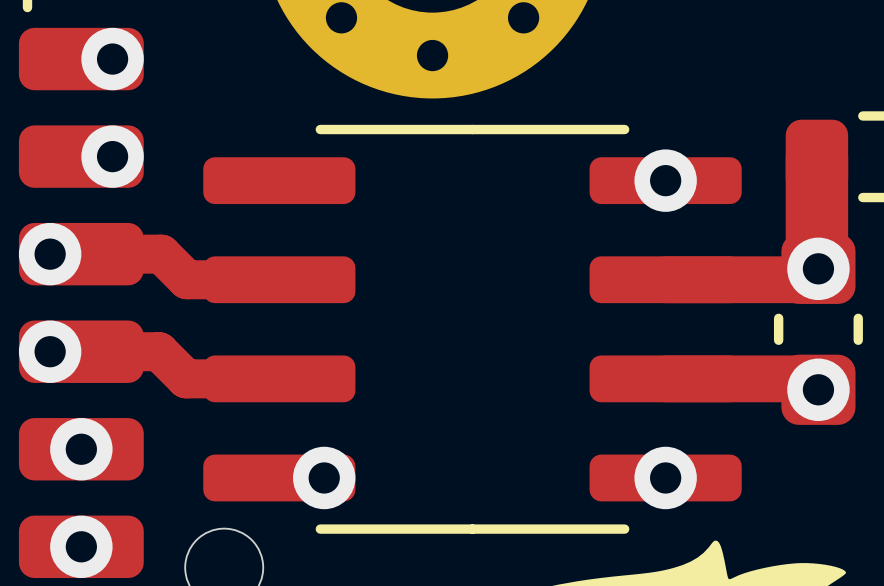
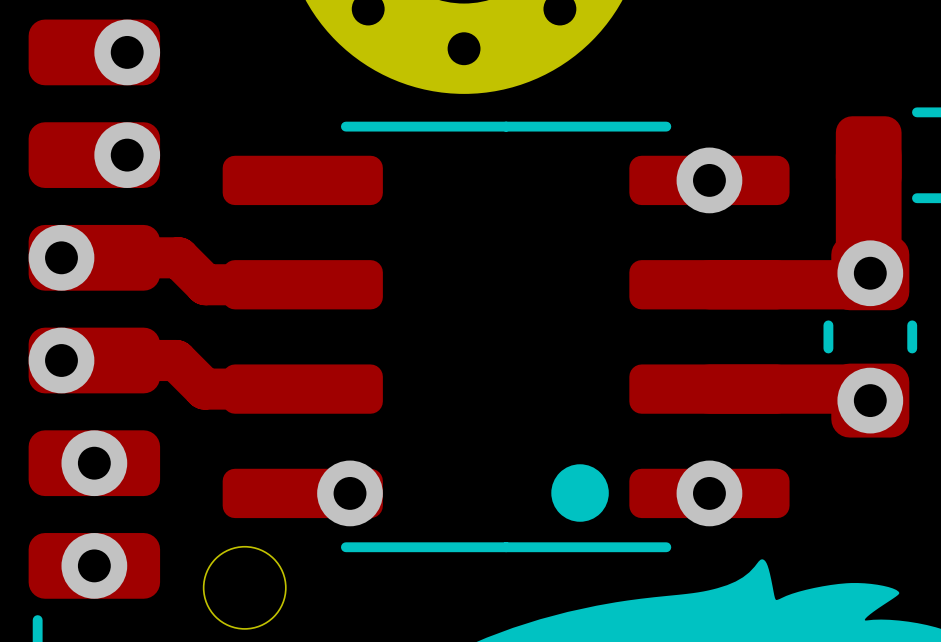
part footprint: [203, 124, 742, 534] -> [222, 121, 790, 553]

